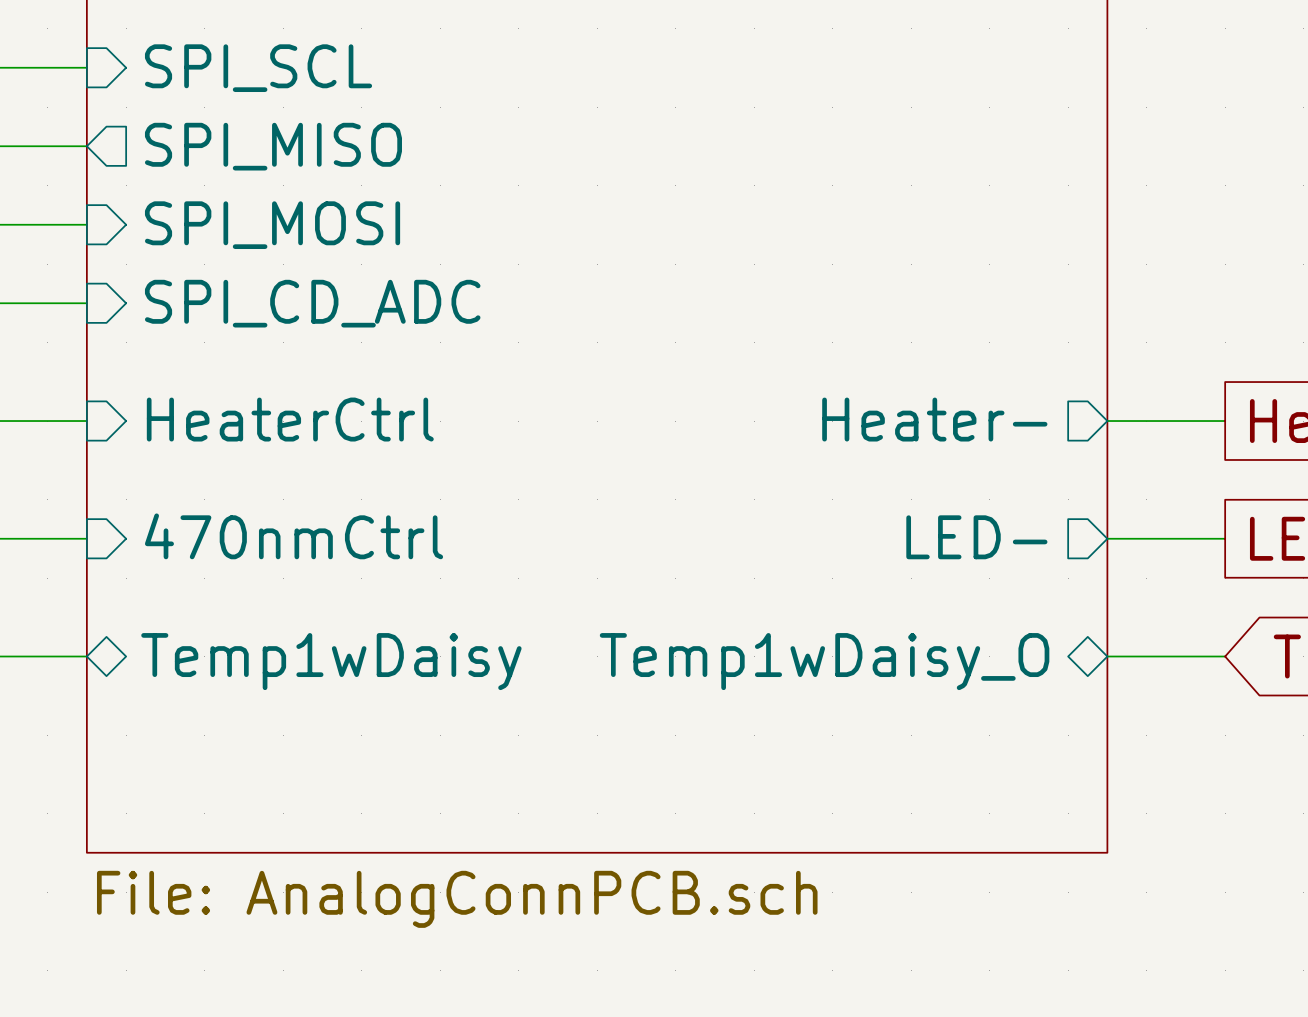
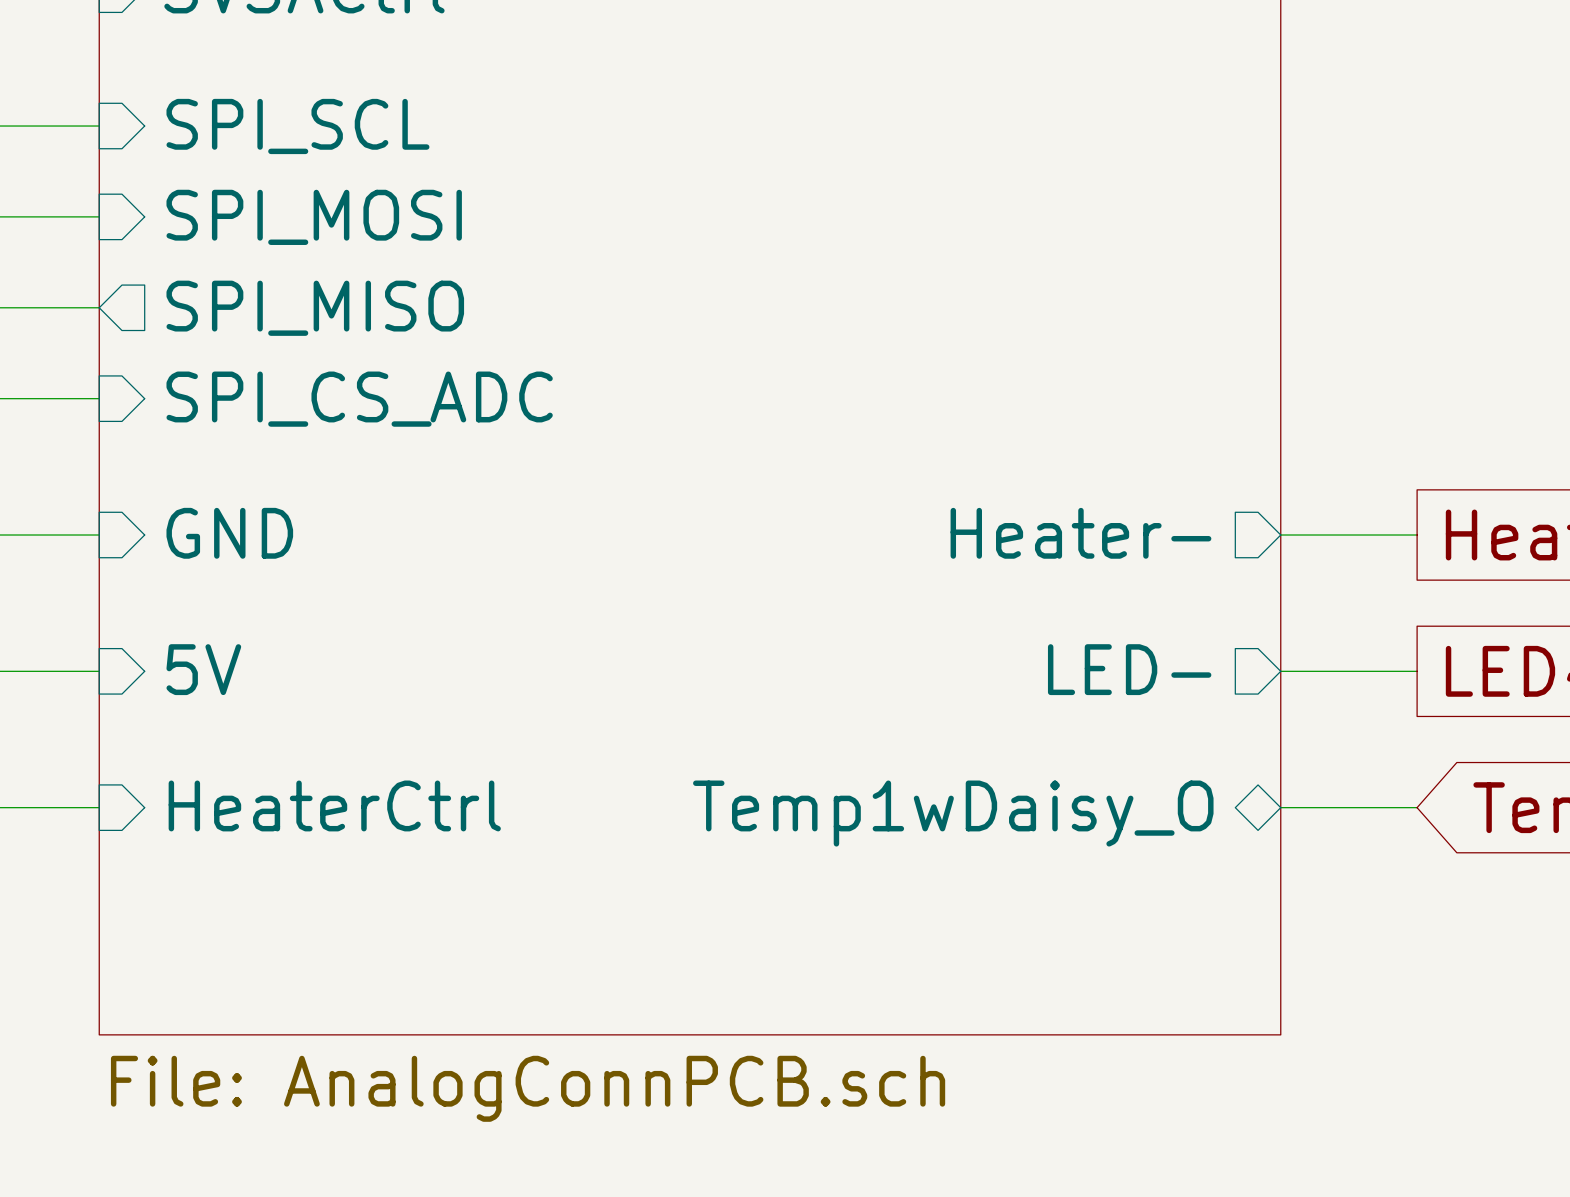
sheet pin shape: output (273, 146) -> input (314, 217)
sheet pin: SPI_MISO (273, 146) -> SPI_MOSI (314, 217)
sheet pin shape: input (272, 225) -> output (315, 308)
sheet pin: SPI_MOSI (272, 225) -> SPI_MISO (315, 308)
sheet pin: SPI_CD_ADC (312, 303) -> SPI_CS_ADC (359, 399)
sheet pin: HeaterCtrl (290, 419) -> GND (229, 533)
sheet pin: 470nmCtrl (294, 536) -> 5V (203, 669)
sheet pin shape: bidirectional (331, 661) -> input (334, 805)
sheet pin: Temp1wDaisy (331, 661) -> HeaterCtrl (334, 805)

